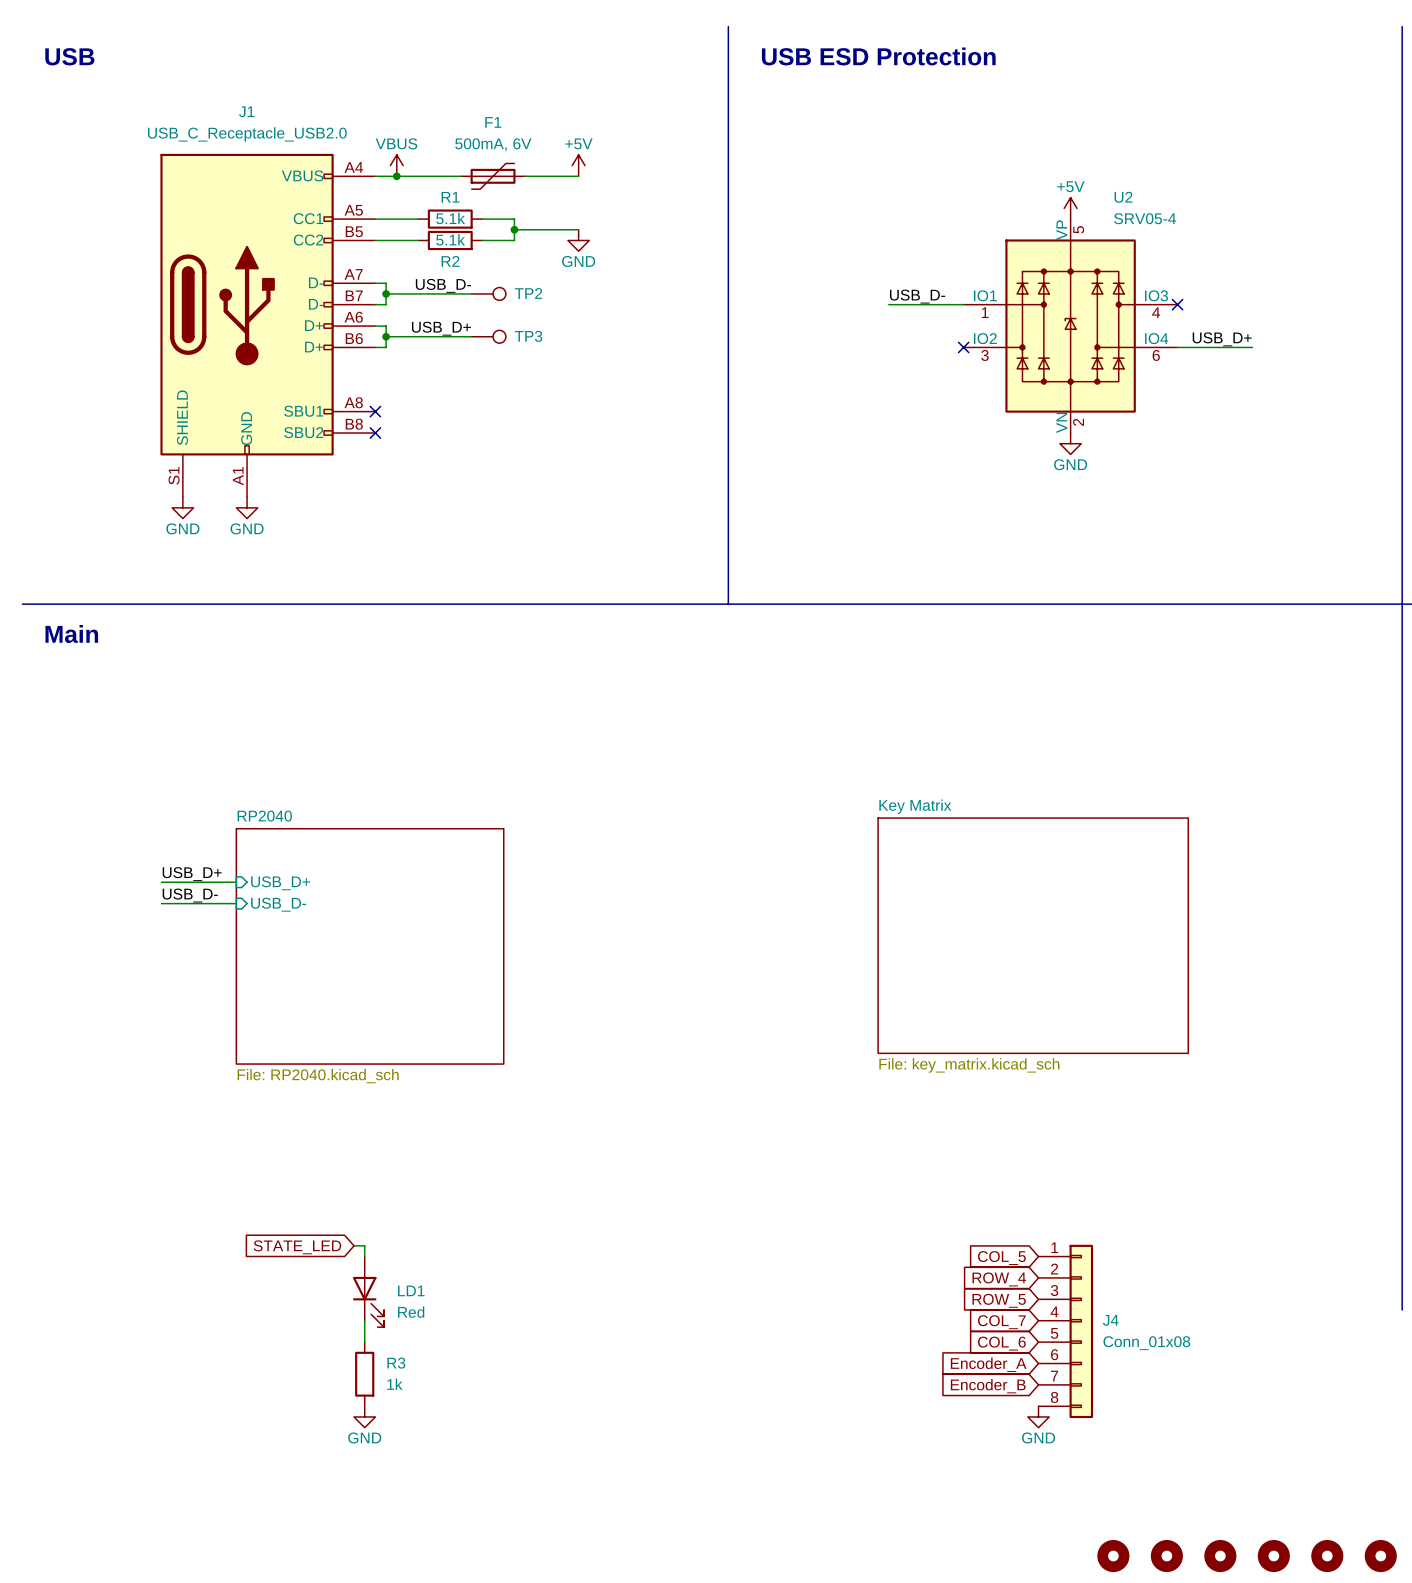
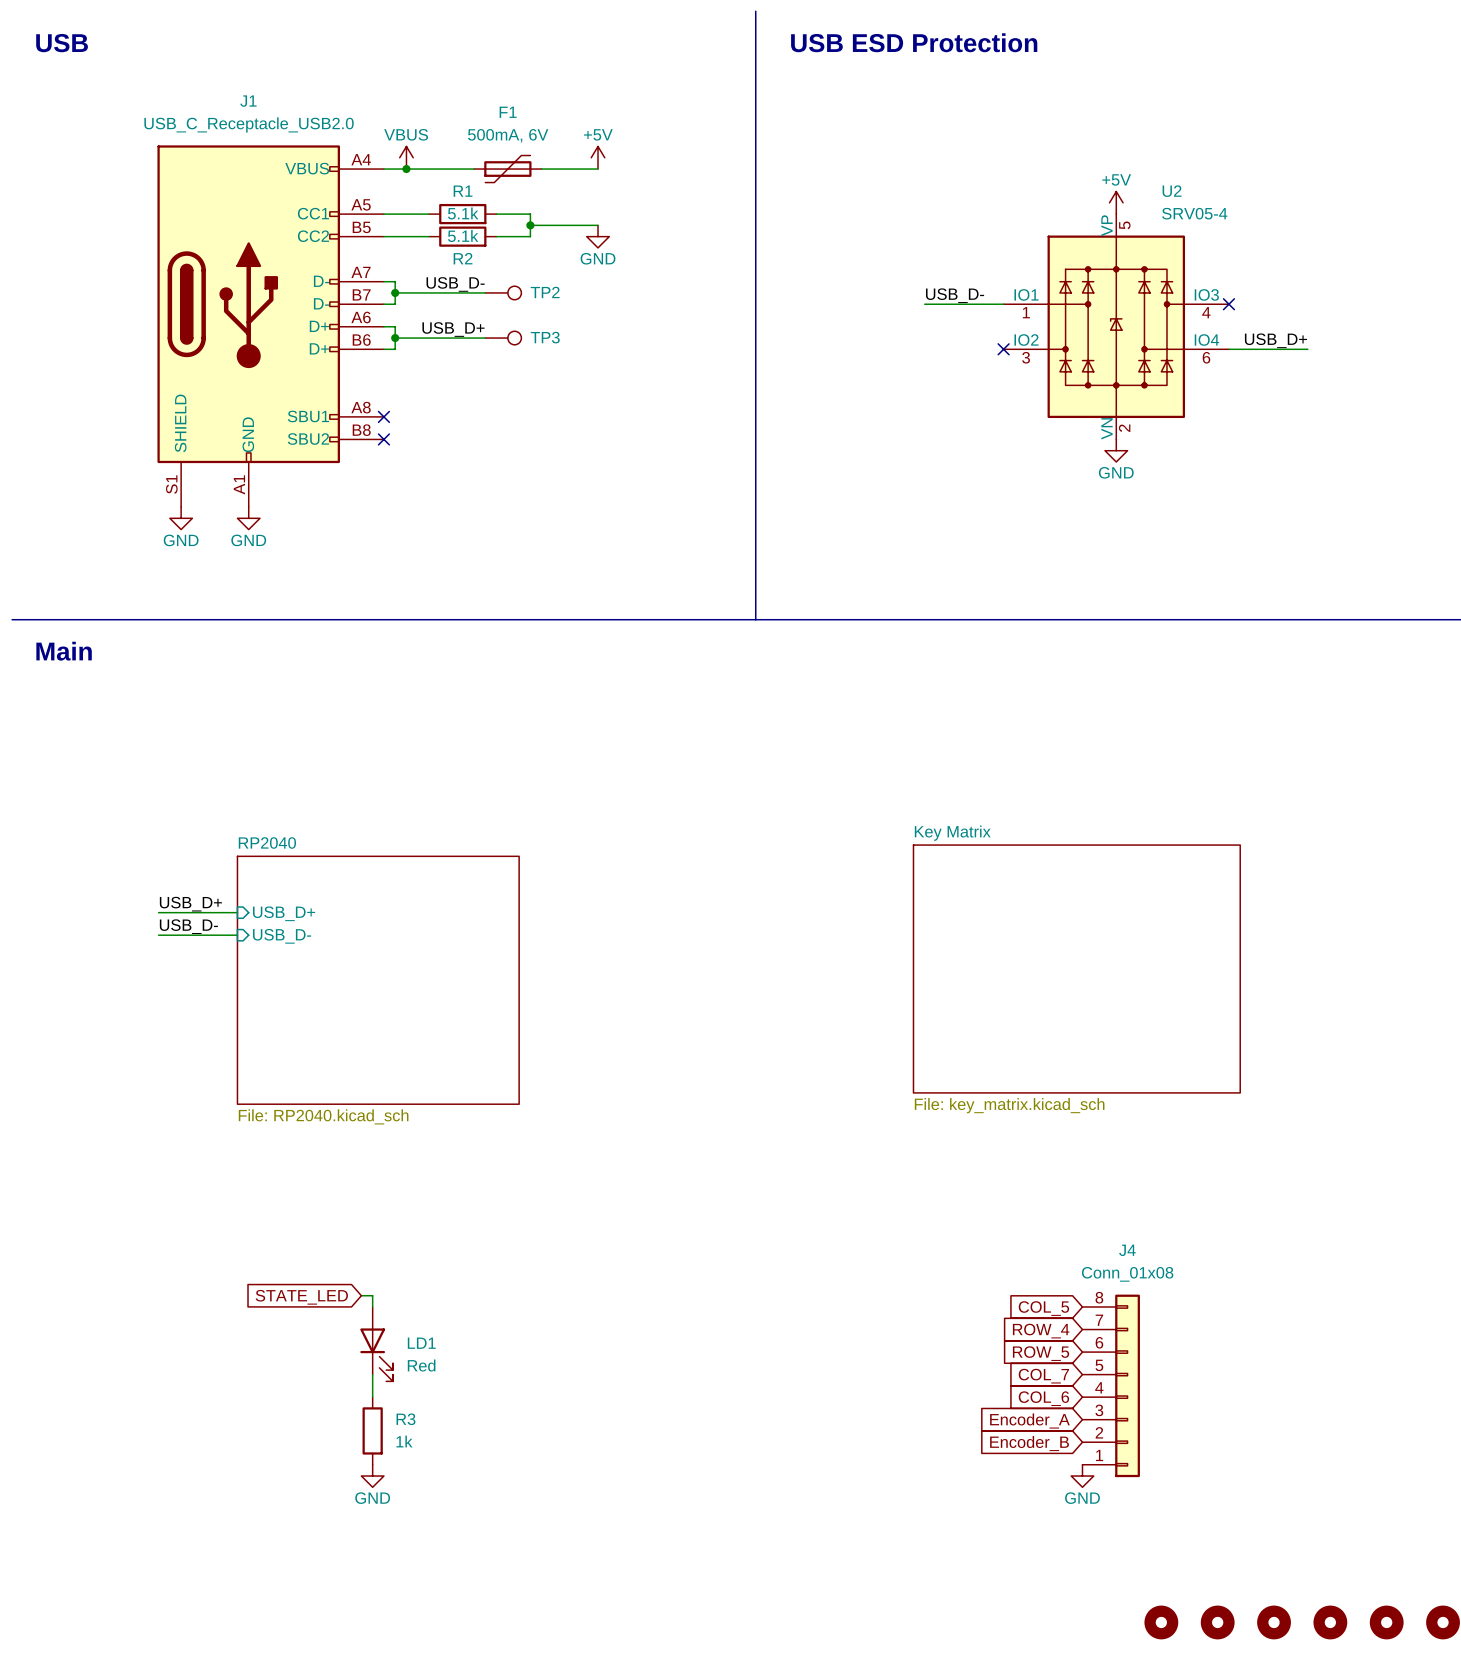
J4 name position: J4 (1110, 1320) -> J4 (1127, 1250)
J4 flip: as is (1081, 1331) -> up-down (1127, 1385)
J4 value position: Conn_01x08 (1146, 1343) -> Conn_01x08 (1127, 1274)

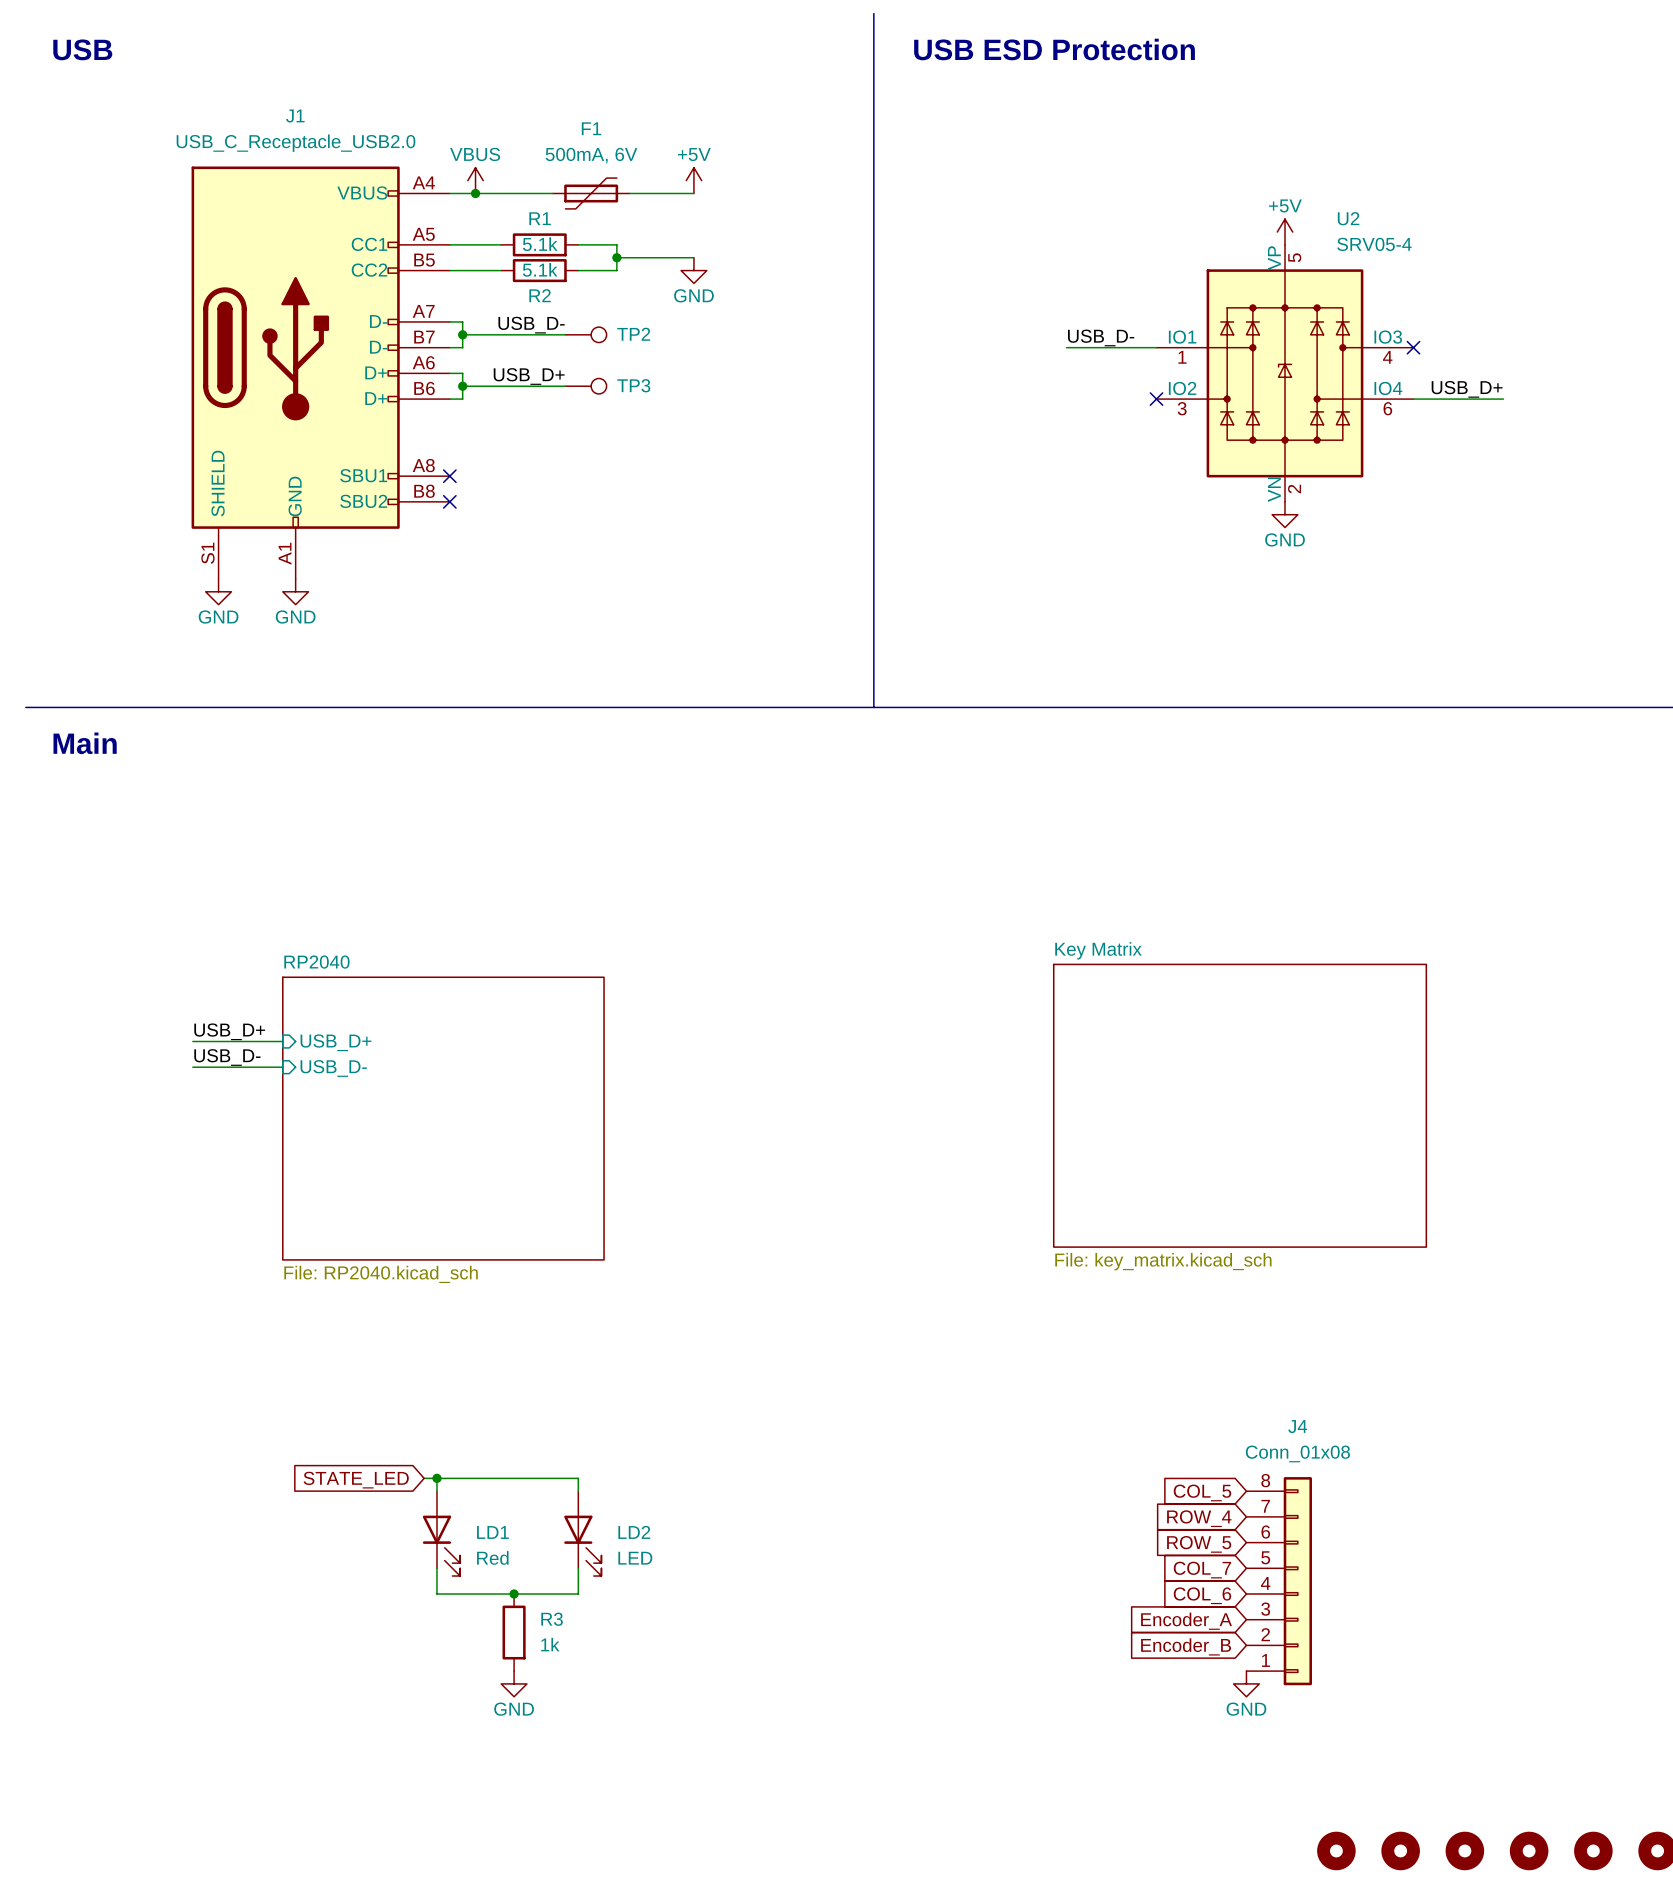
wire: none -> (436, 1478) (578, 1478) (578, 1491)
junction: none -> (436, 1478)
LD2: none -> LED (582, 1533)
wire: none -> (578, 1568) (578, 1594) (436, 1594)
junction: none -> (514, 1594)
R3 position: (372, 1430) -> (514, 1632)
power symbol position: GND (372, 1476) -> GND (514, 1683)

